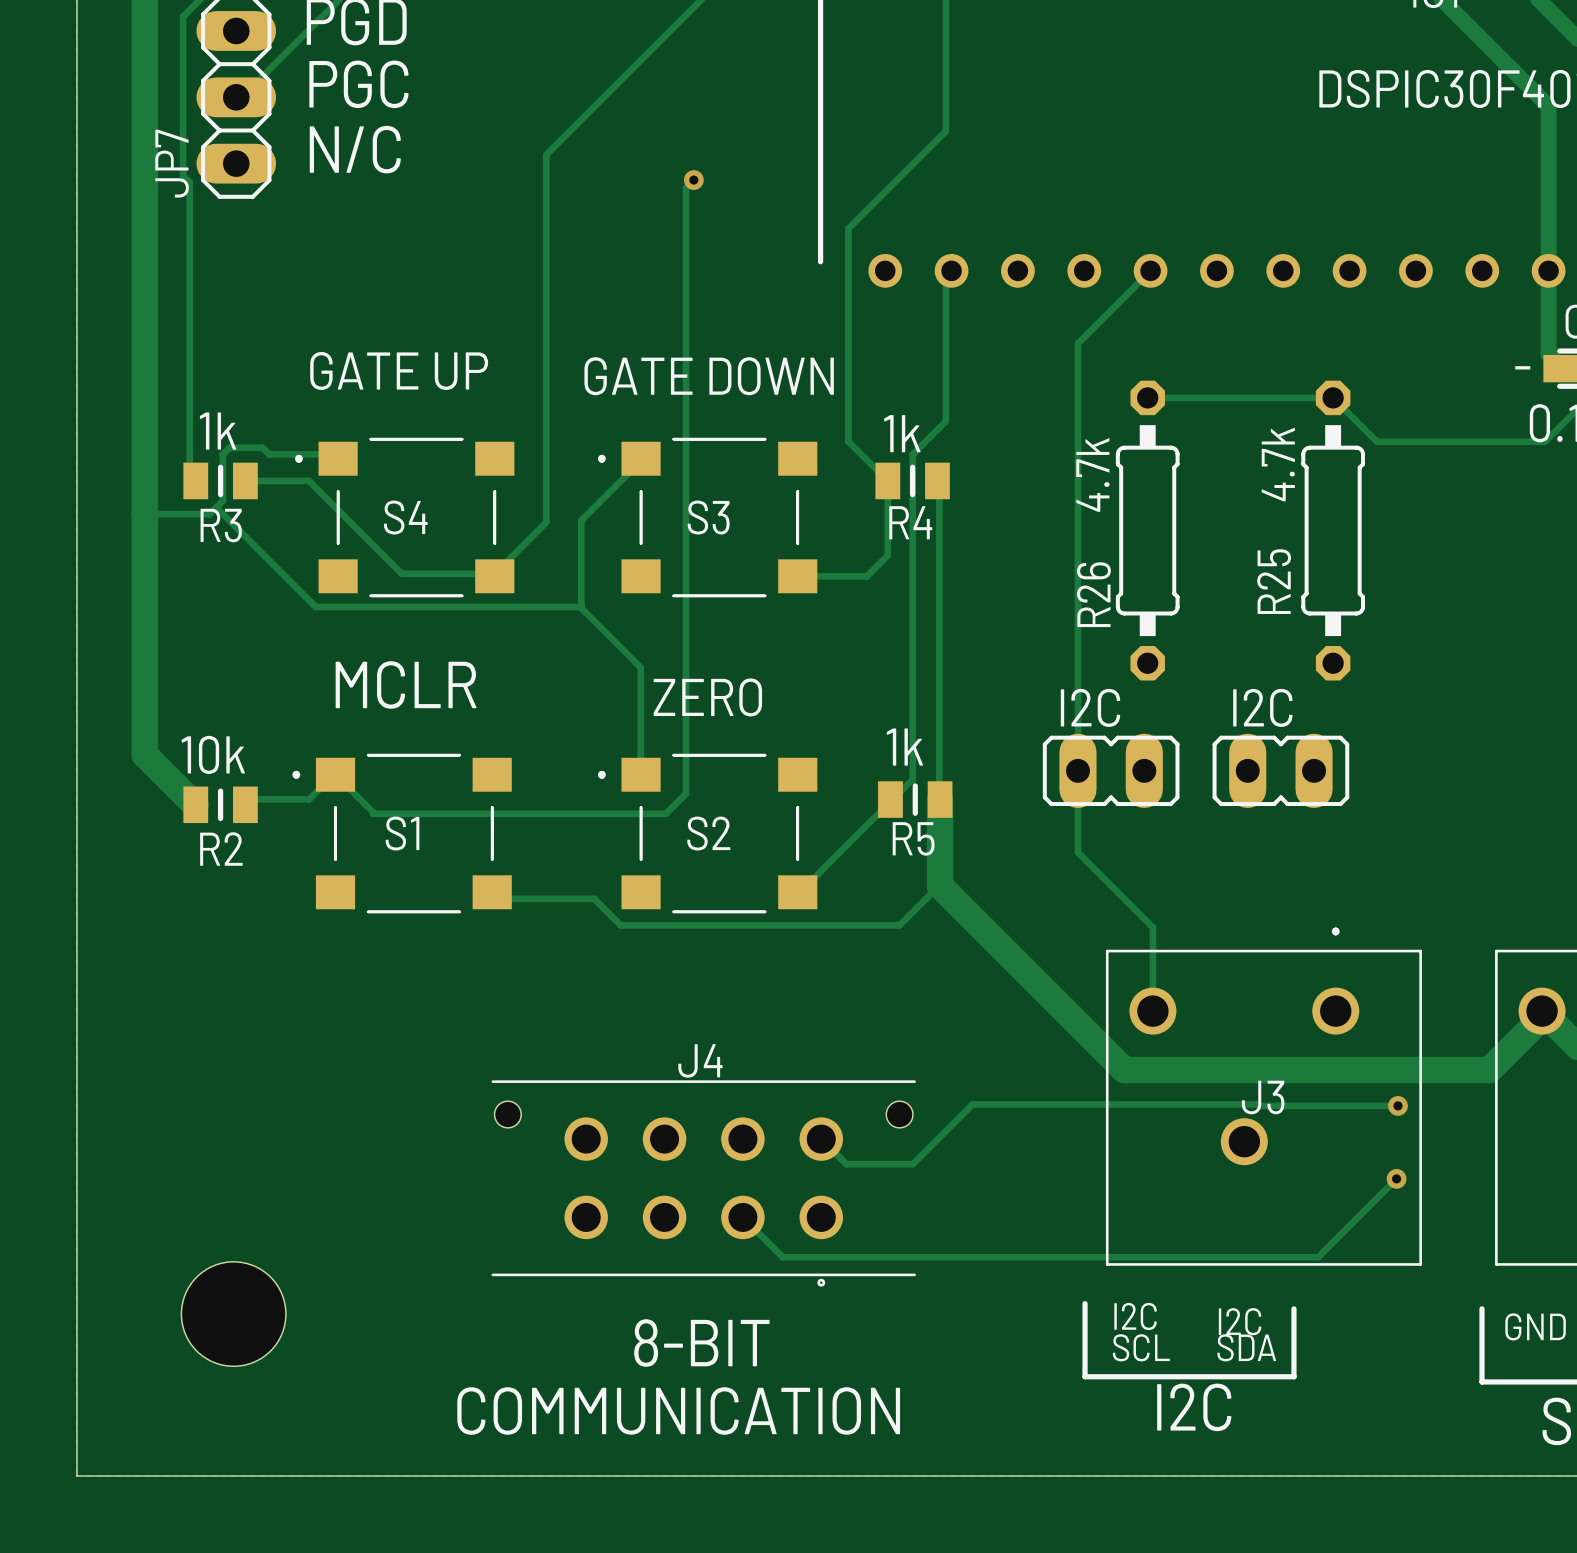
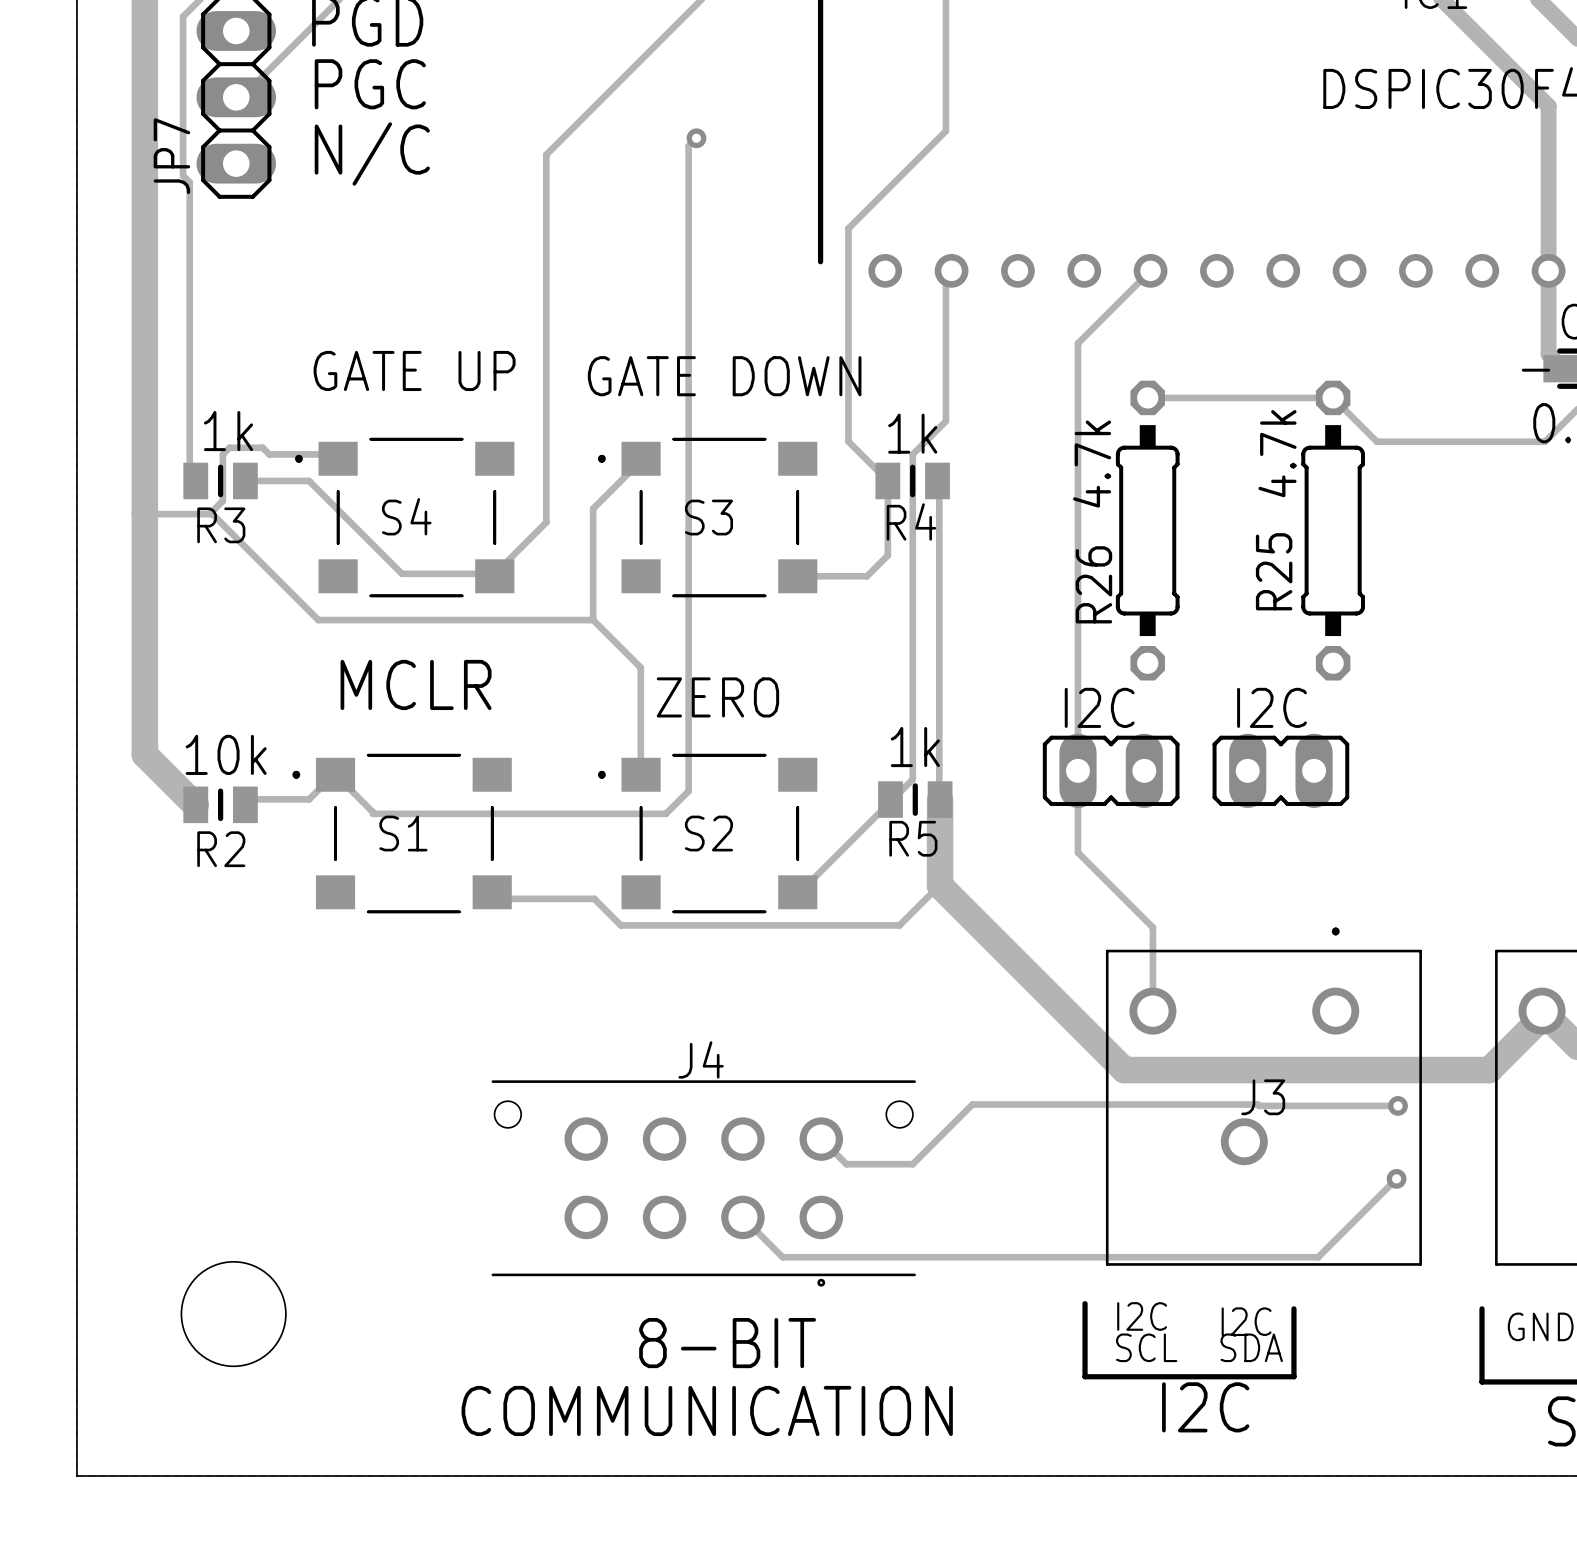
track: (693, 180) (686, 187) (686, 793) -> (696, 138) (688, 146) (688, 791) (686, 793)
via position: (693, 180) -> (696, 138)
track: (216, 507) (315, 607) (580, 607) -> none
track: (593, 508) (581, 520) (580, 607) -> (593, 508) (593, 620) (318, 620) (211, 512)
track: (580, 607) (593, 620) -> none

